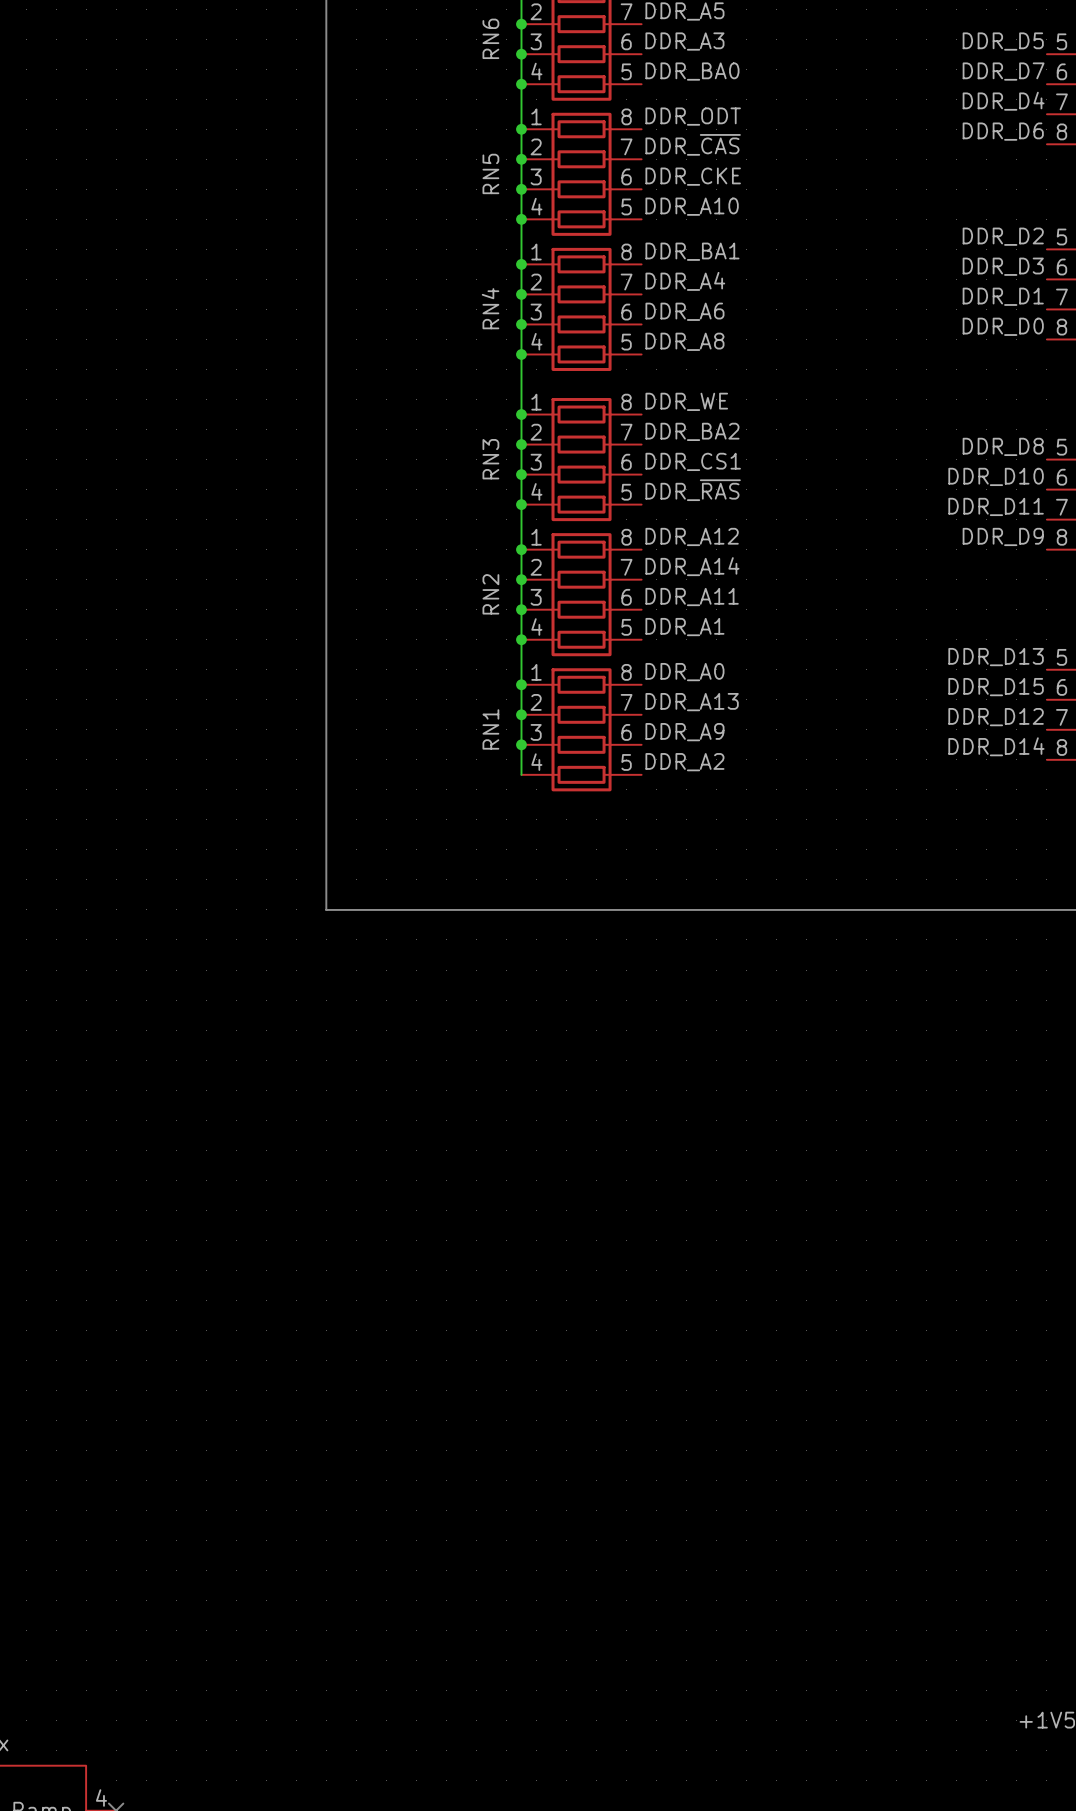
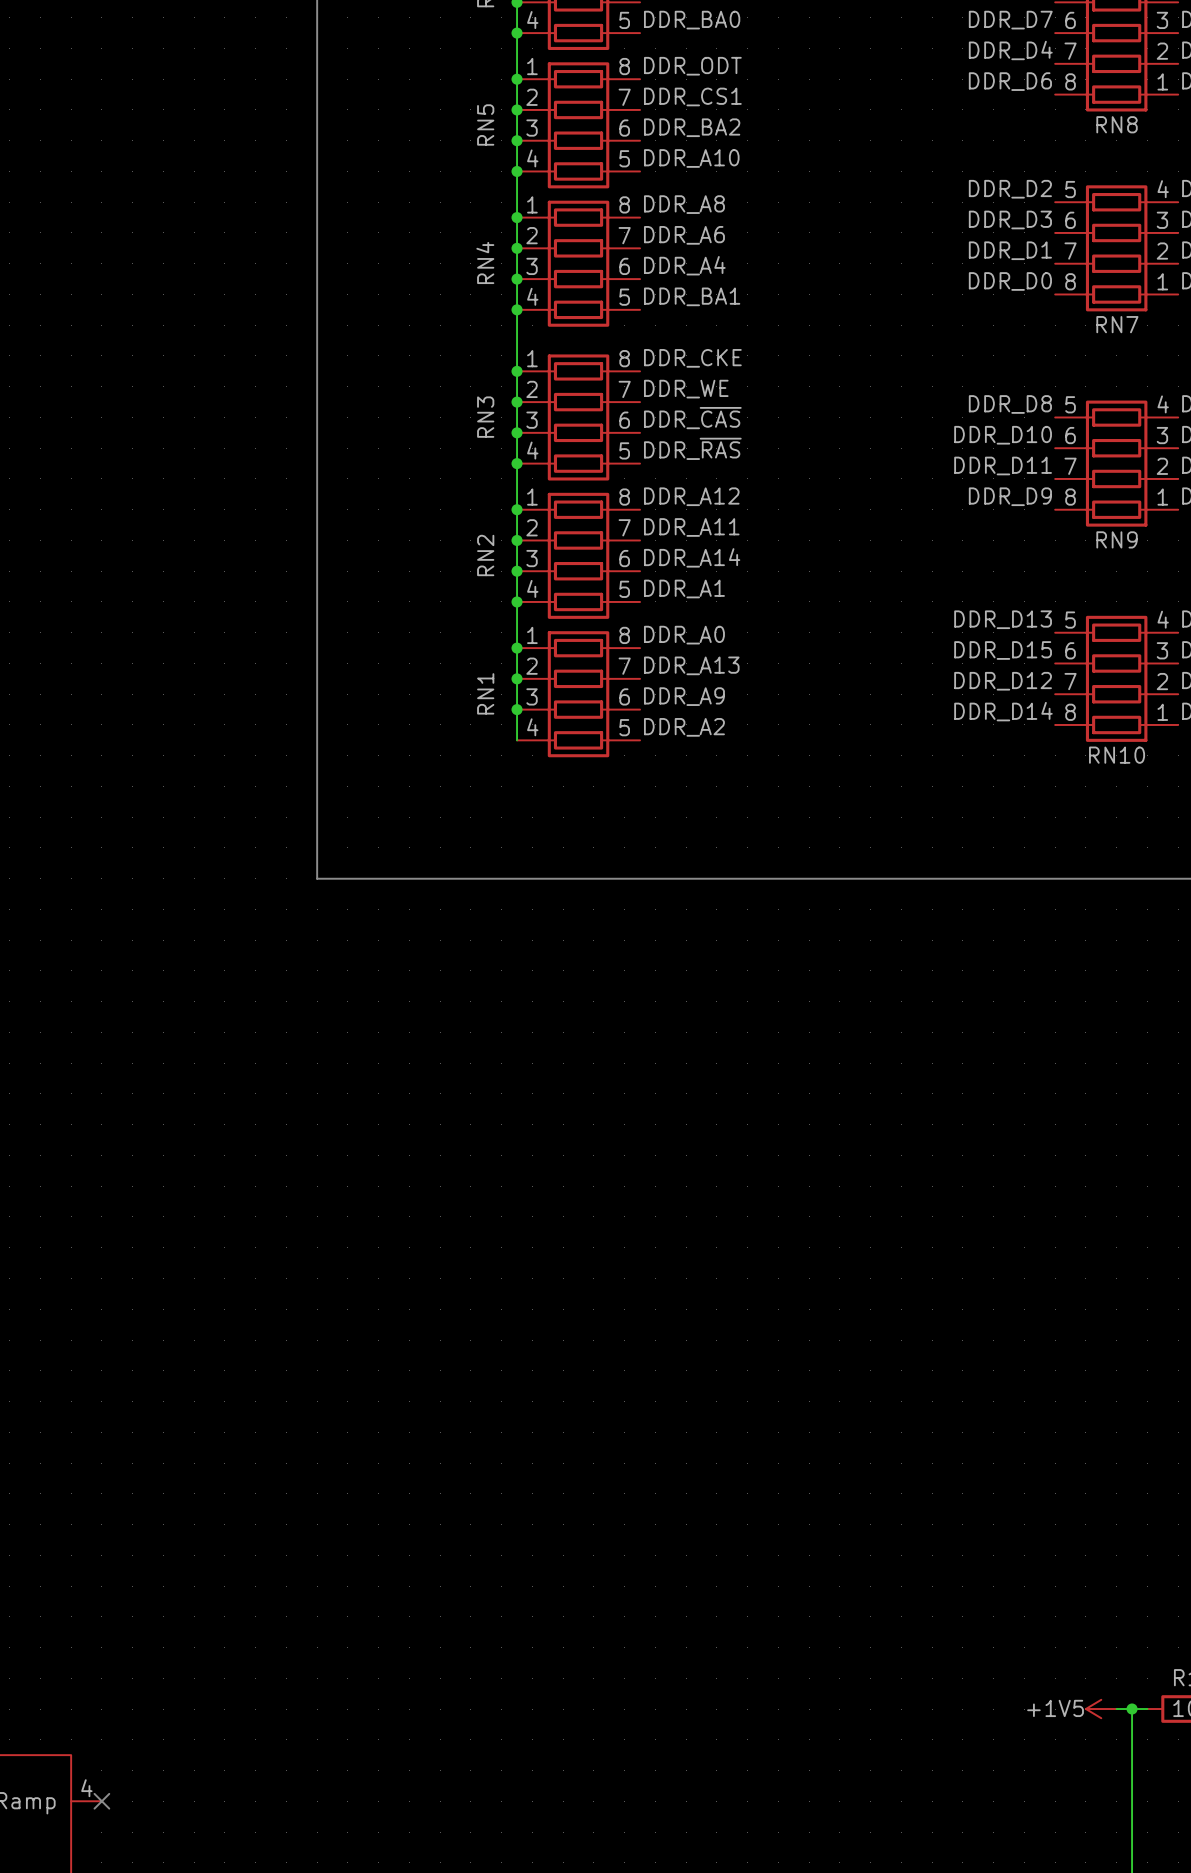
label: DDR_~{CAS} (693, 144) -> DDR_CS1 (692, 96)
label: DDR_CKE (693, 176) -> DDR_BA2 (692, 127)
label: DDR_BA1 (692, 251) -> DDR_A8 (684, 204)
label: DDR_A4 (685, 281) -> DDR_A6 (684, 235)
label: DDR_A6 (684, 311) -> DDR_A4 (684, 265)
label: DDR_A8 (684, 341) -> DDR_BA1 (692, 296)
label: DDR_WE (686, 401) -> DDR_CKE (692, 358)
label: DDR_BA2 (692, 431) -> DDR_WE (686, 389)
label: DDR_CS1 (693, 461) -> DDR_~{CAS} (692, 418)
label: DDR_A14 (692, 566) -> DDR_A11 (691, 527)
label: DDR_A11 (692, 597) -> DDR_A14 (692, 557)

